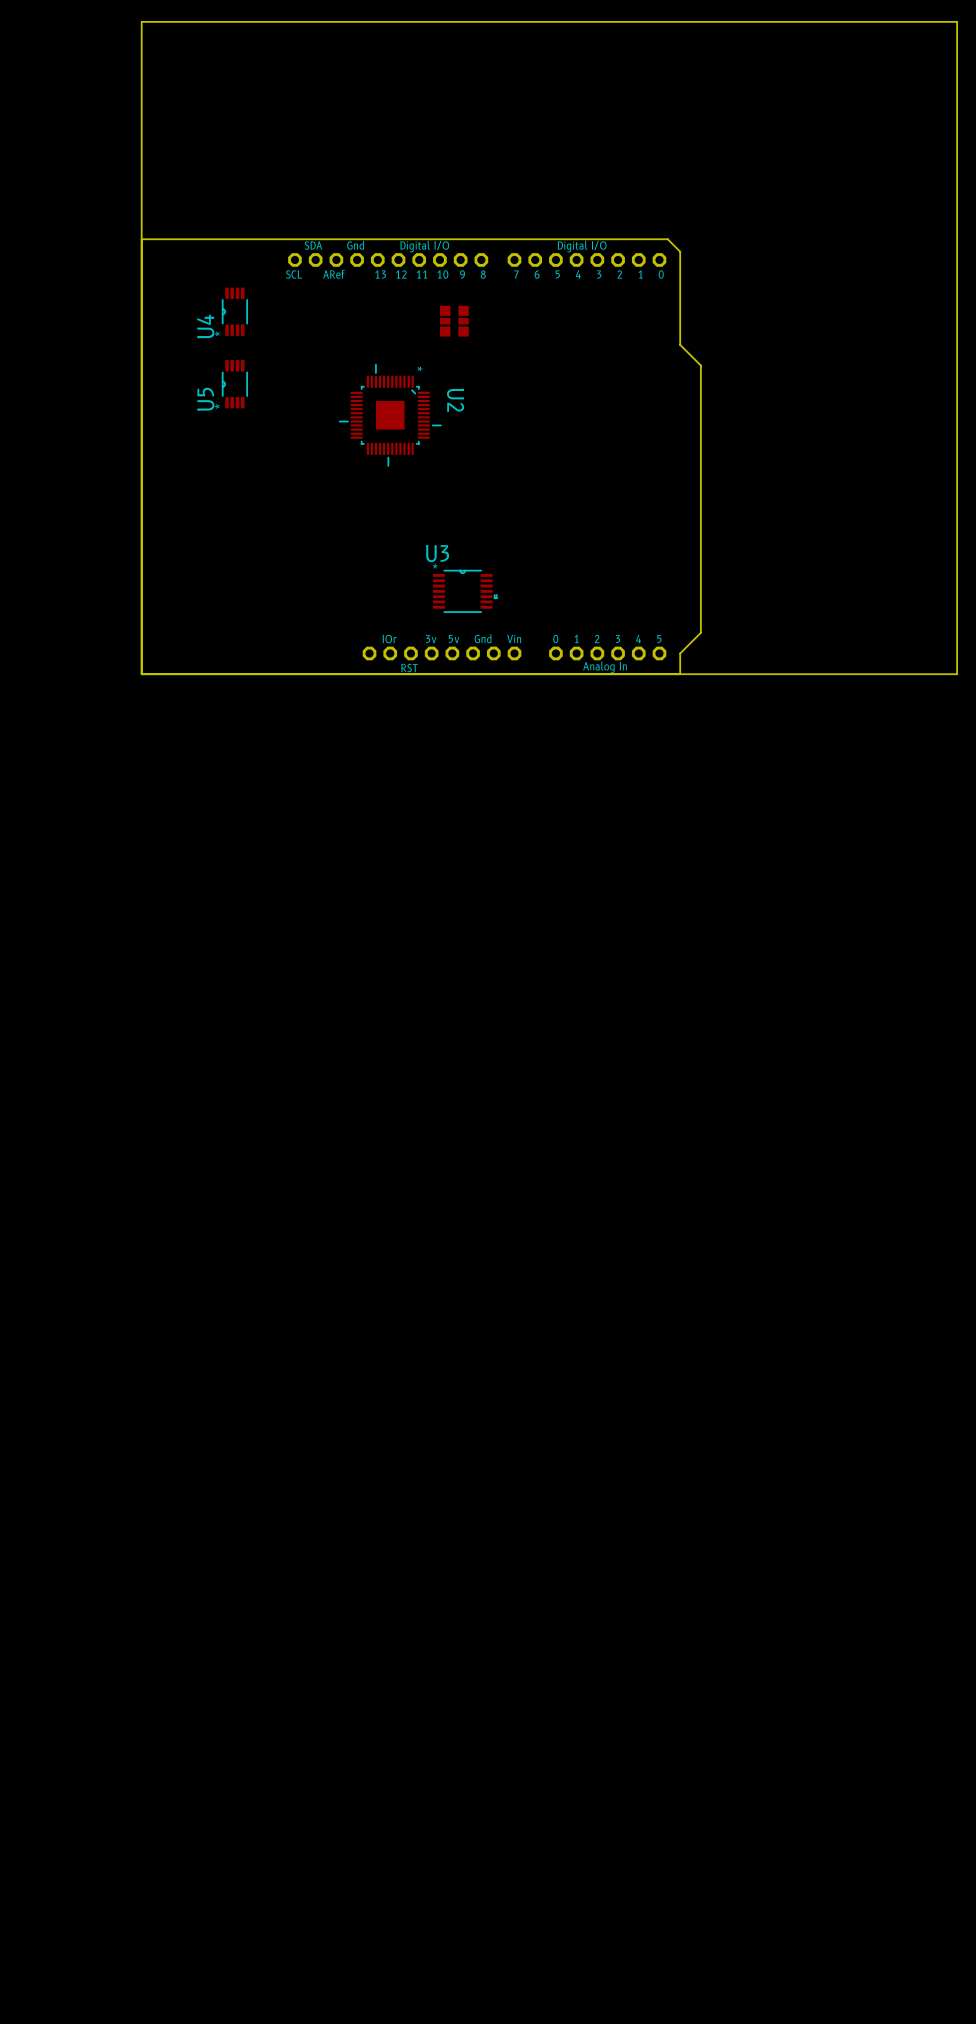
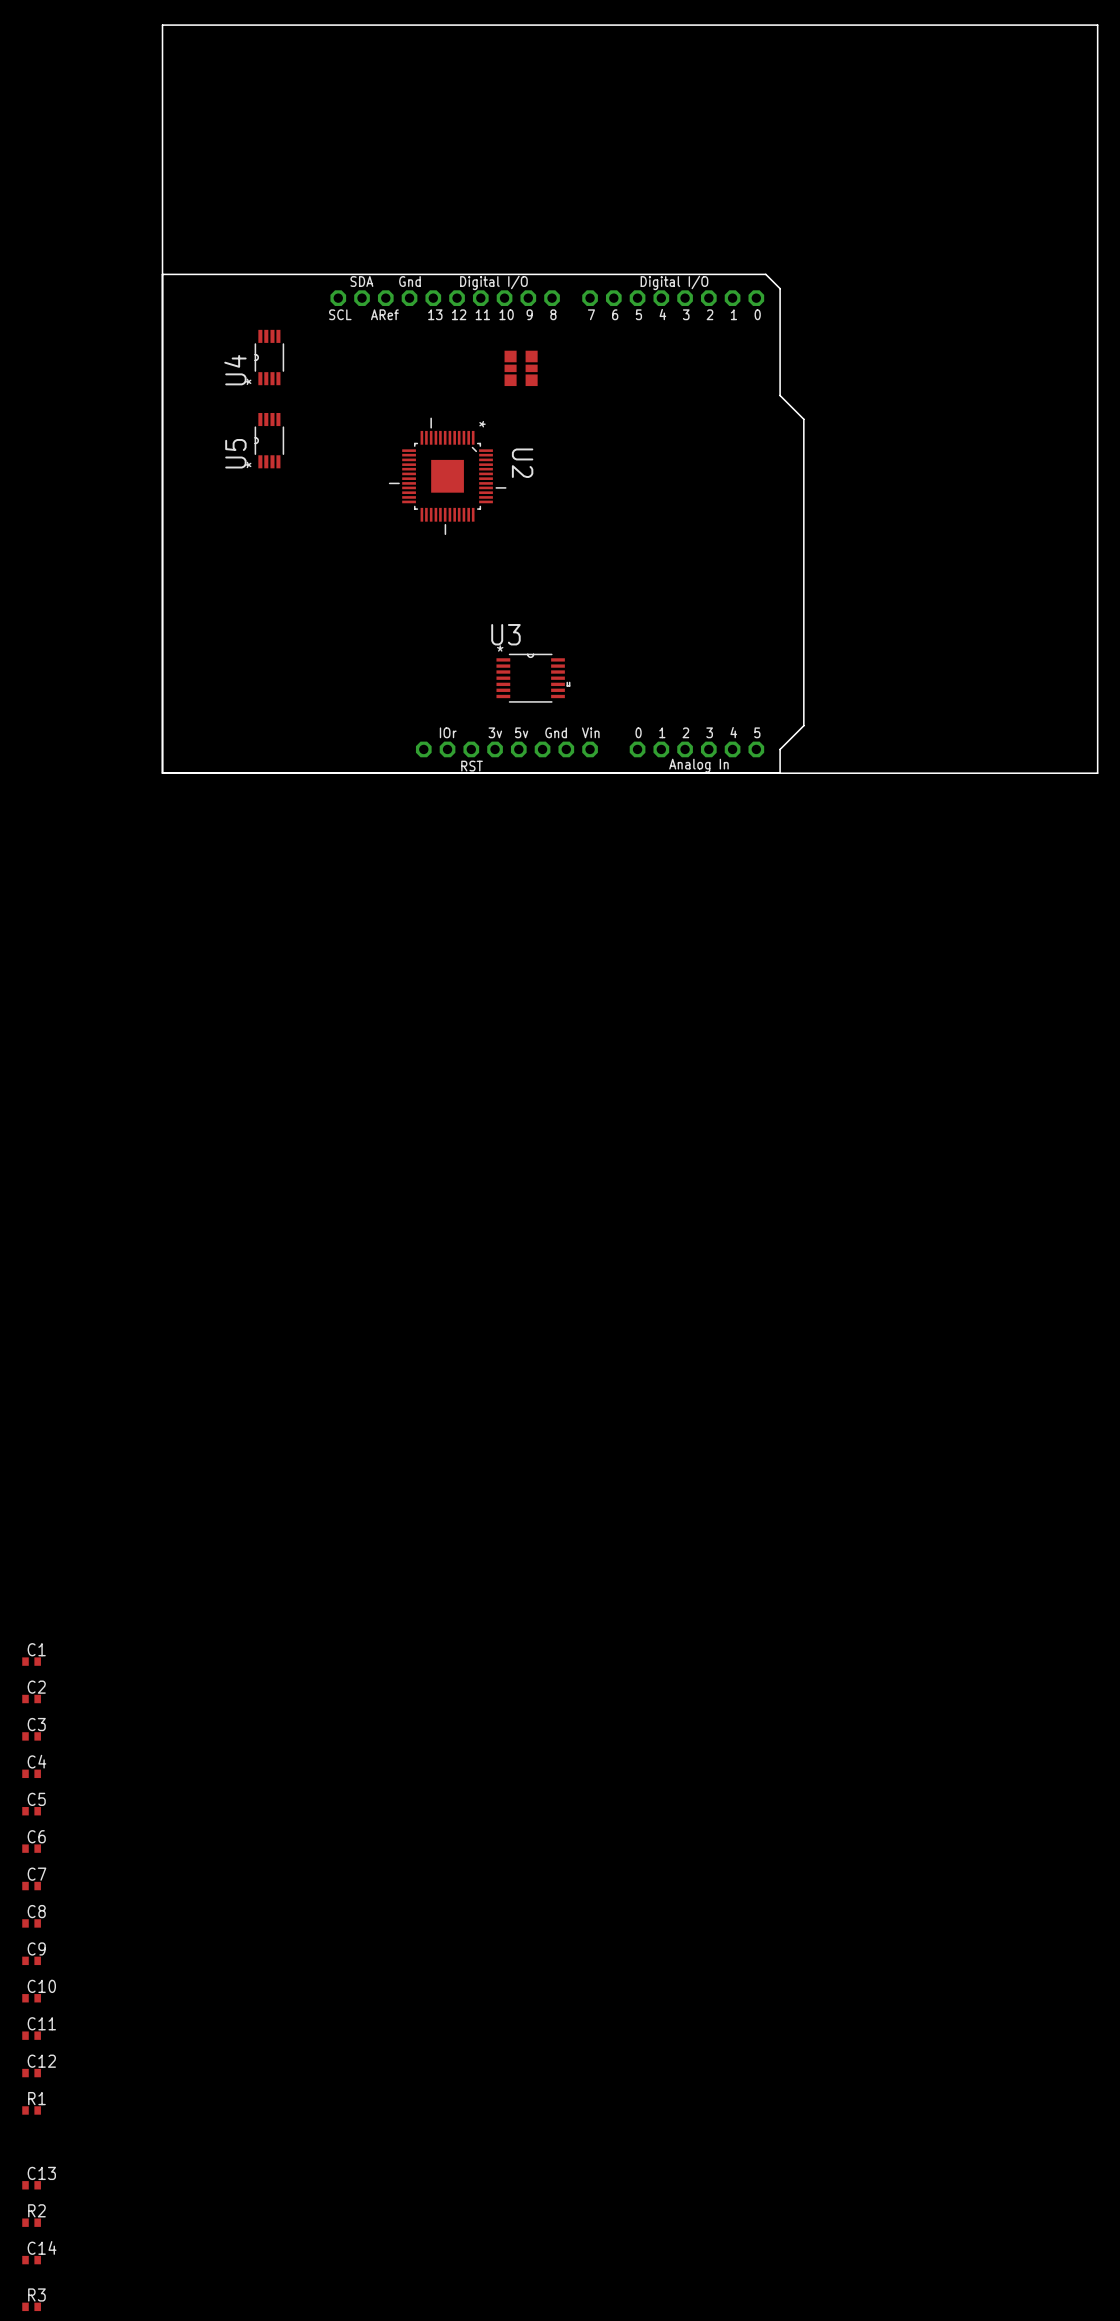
C1: none -> (31, 1661)
C2: none -> (31, 1699)
C3: none -> (31, 1736)
C4: none -> (31, 1773)
C5: none -> (31, 1811)
C6: none -> (31, 1848)
C7: none -> (31, 1886)
C8: none -> (31, 1923)
C9: none -> (31, 1960)
C10: none -> (31, 1998)
C11: none -> (31, 2035)
C12: none -> (31, 2073)
R1: none -> (31, 2110)
C13: none -> (31, 2185)
R2: none -> (31, 2222)
C14: none -> (31, 2260)
R3: none -> (31, 2306)

